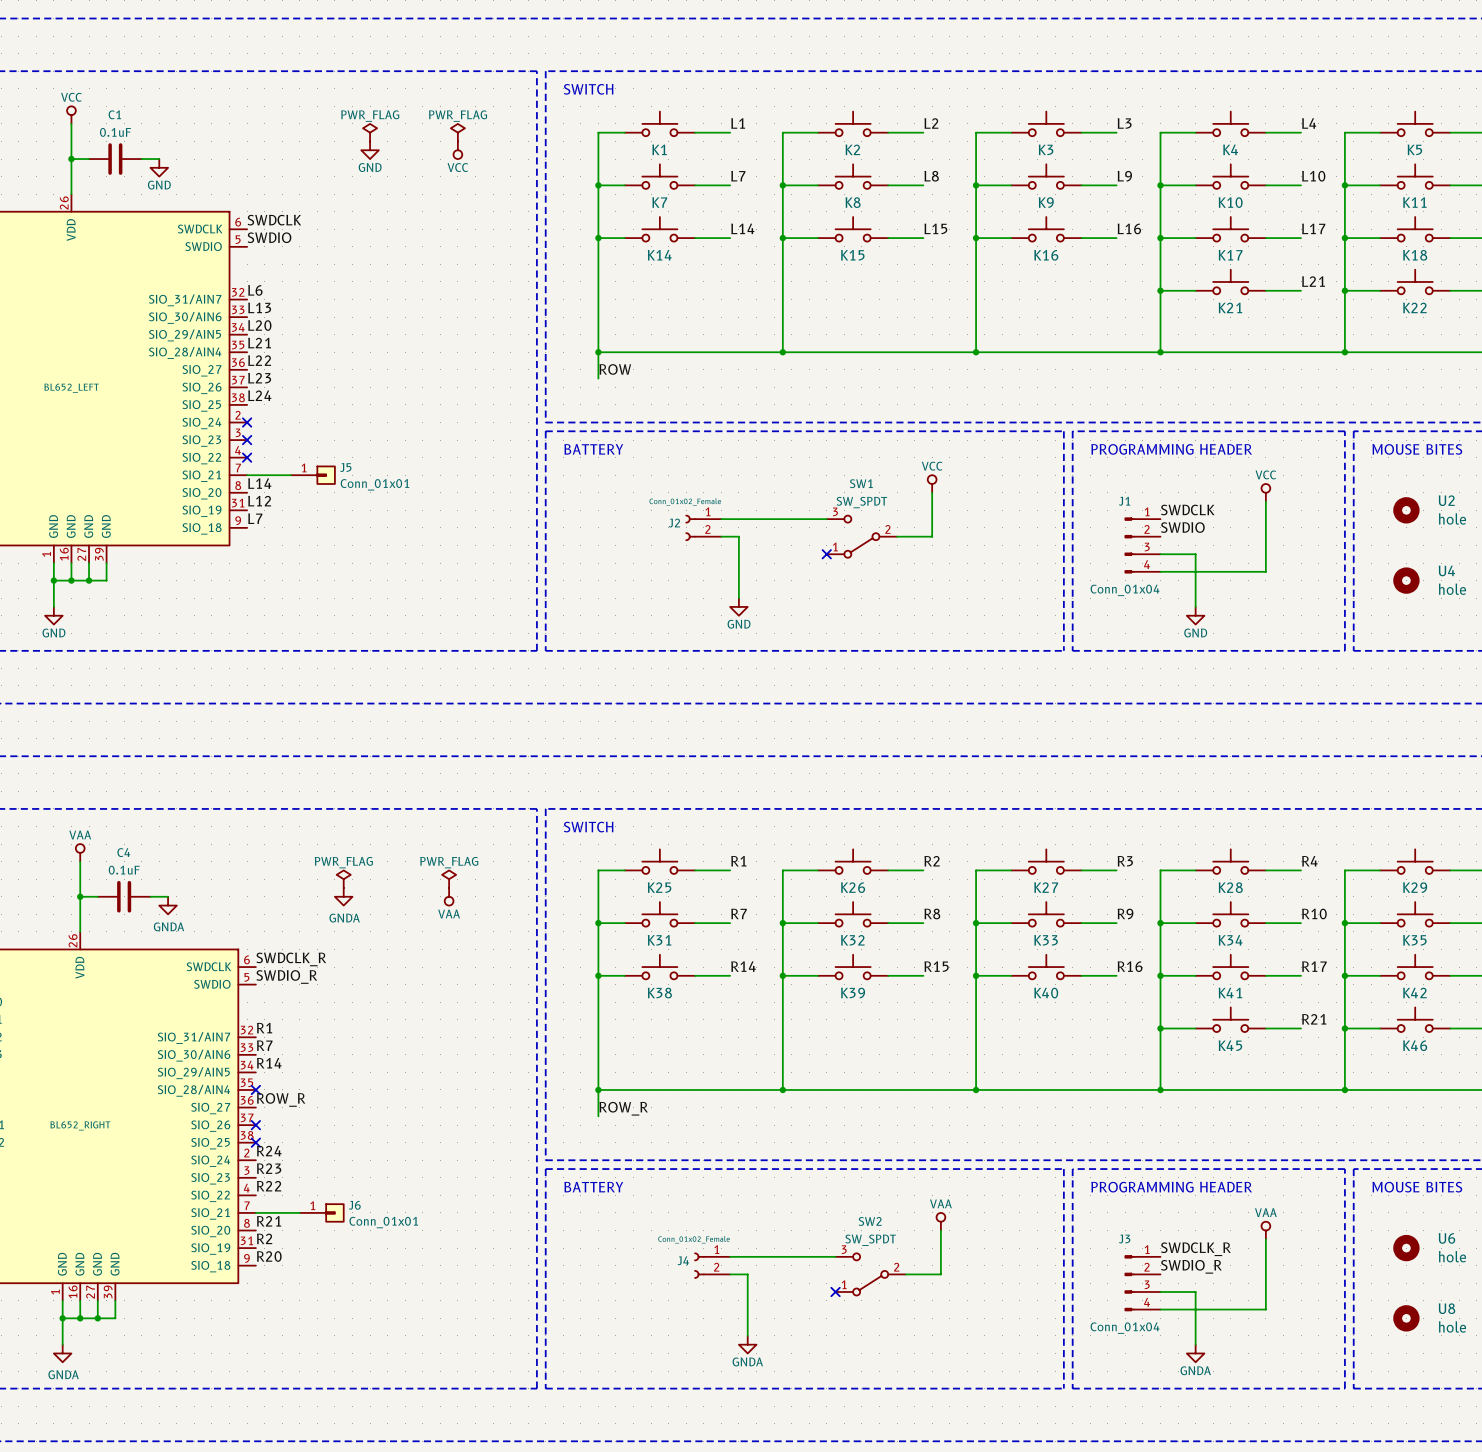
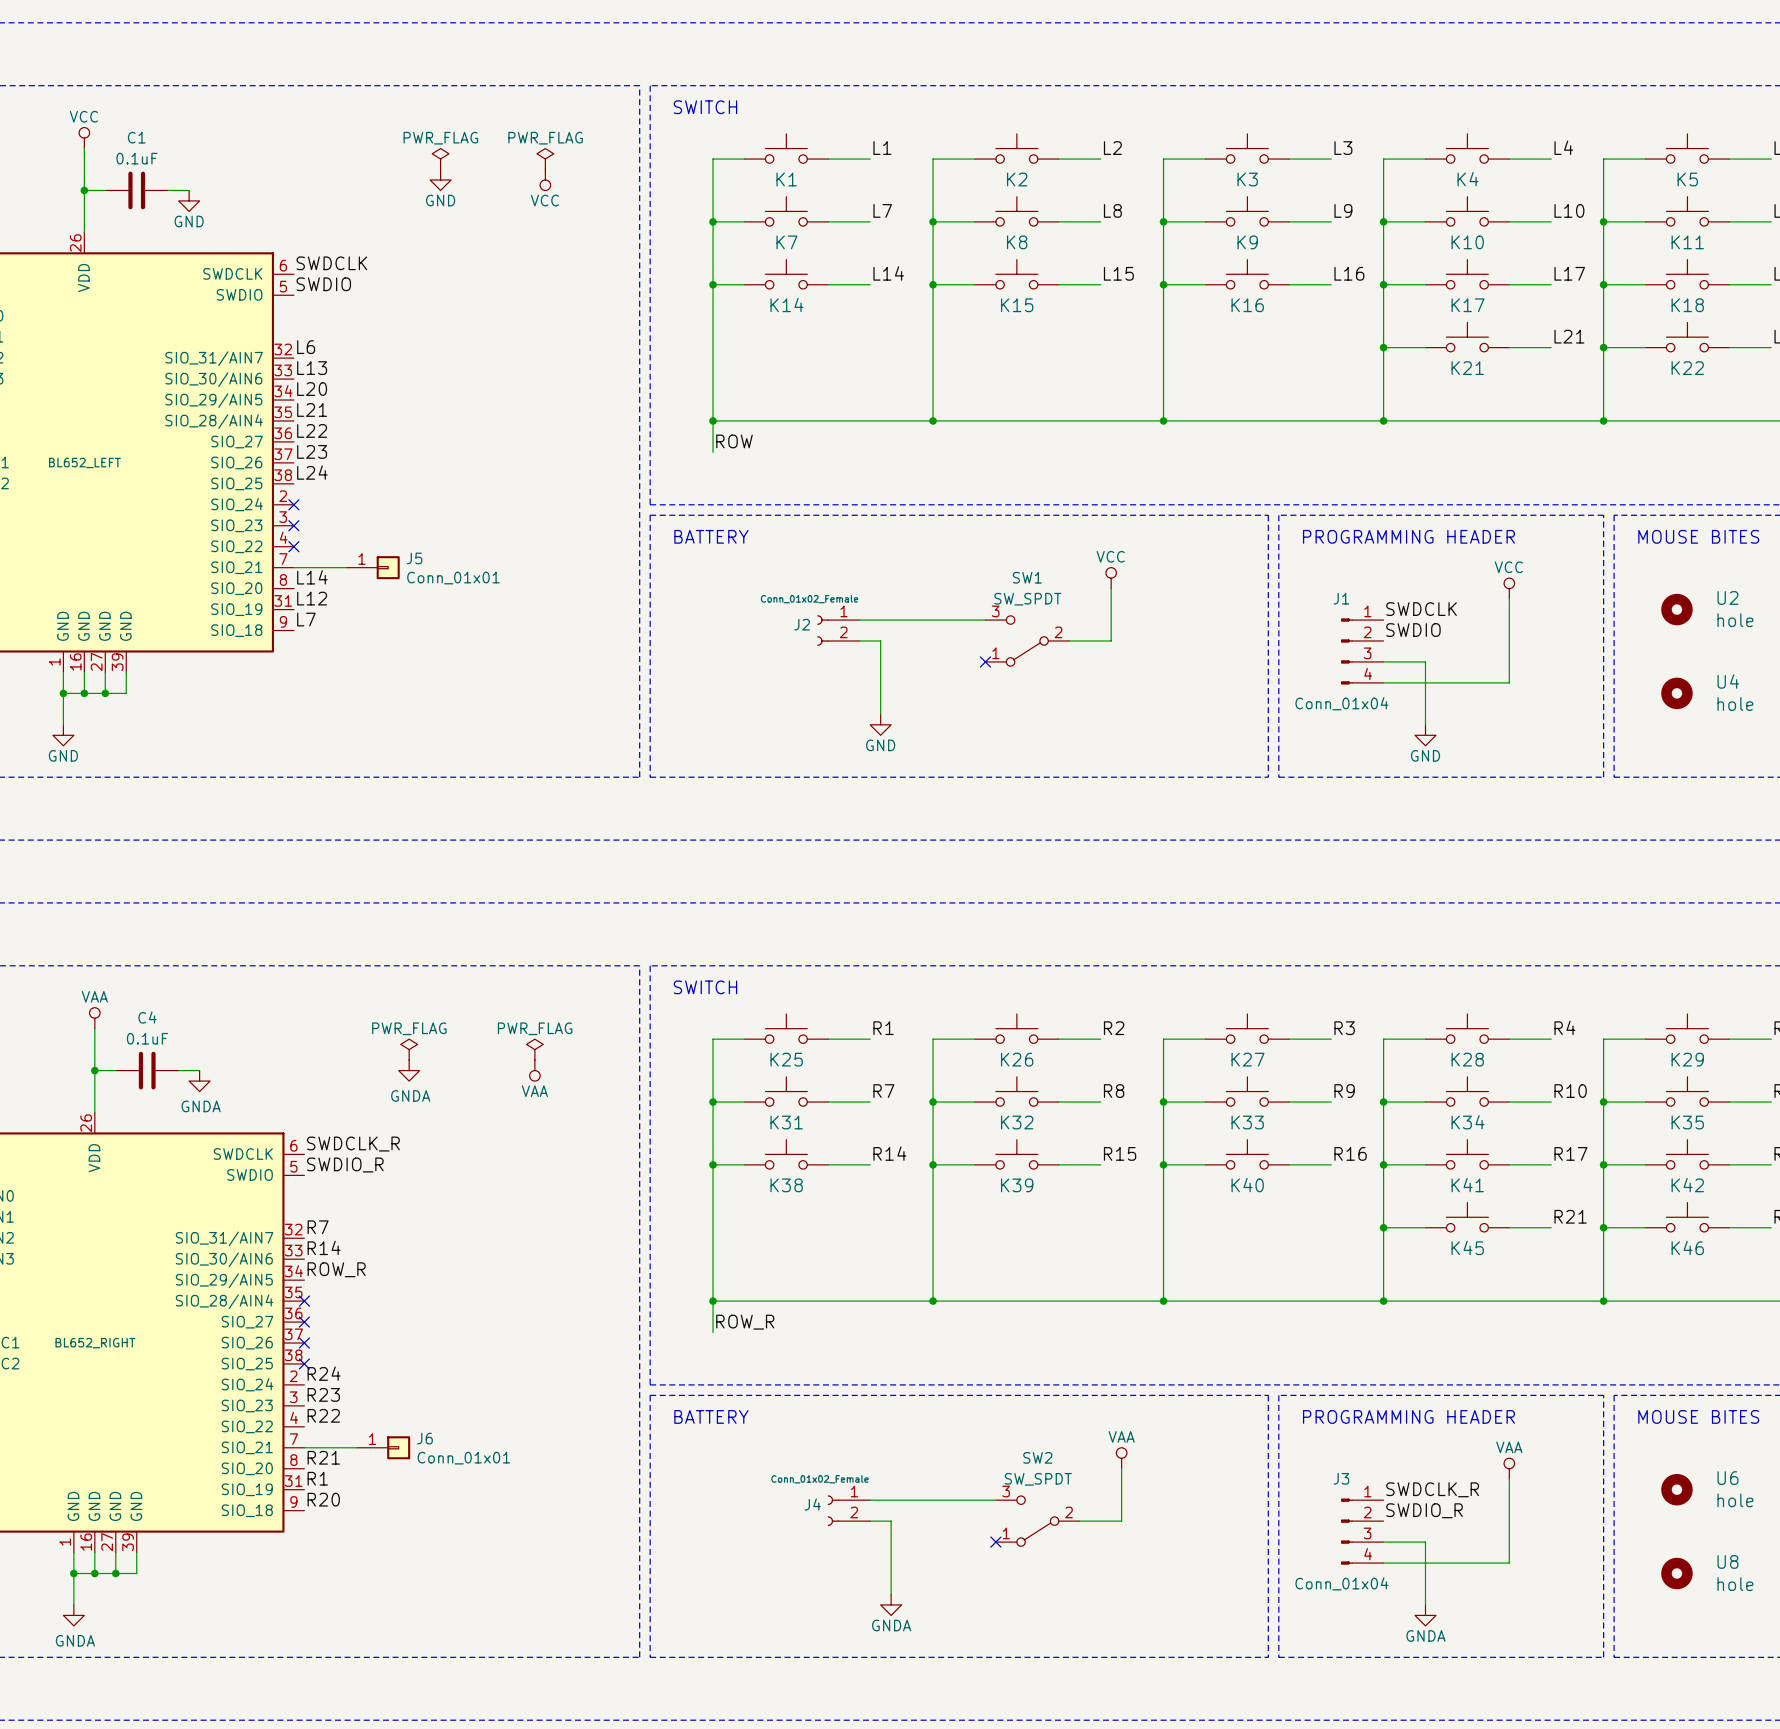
label: R1 (264, 1028) -> R7 (318, 1227)
label: R7 (264, 1045) -> R14 (324, 1247)
label: R14 (269, 1063) -> ROW_R (336, 1269)
label: ROW_R (281, 1099) -> none
no-connect mark: none -> (304, 1322)
label: R2 (264, 1238) -> R1 (317, 1478)

